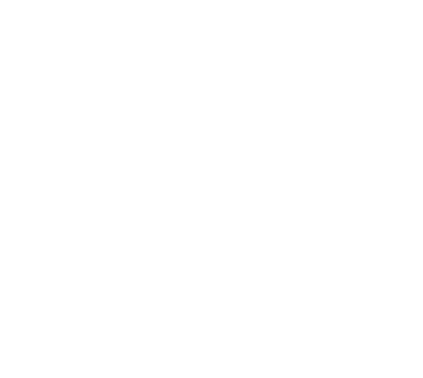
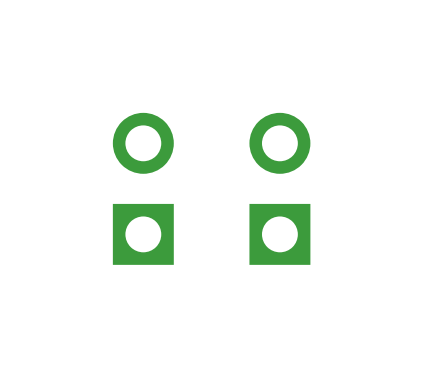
part: none -> (143, 188)
part: none -> (279, 188)

